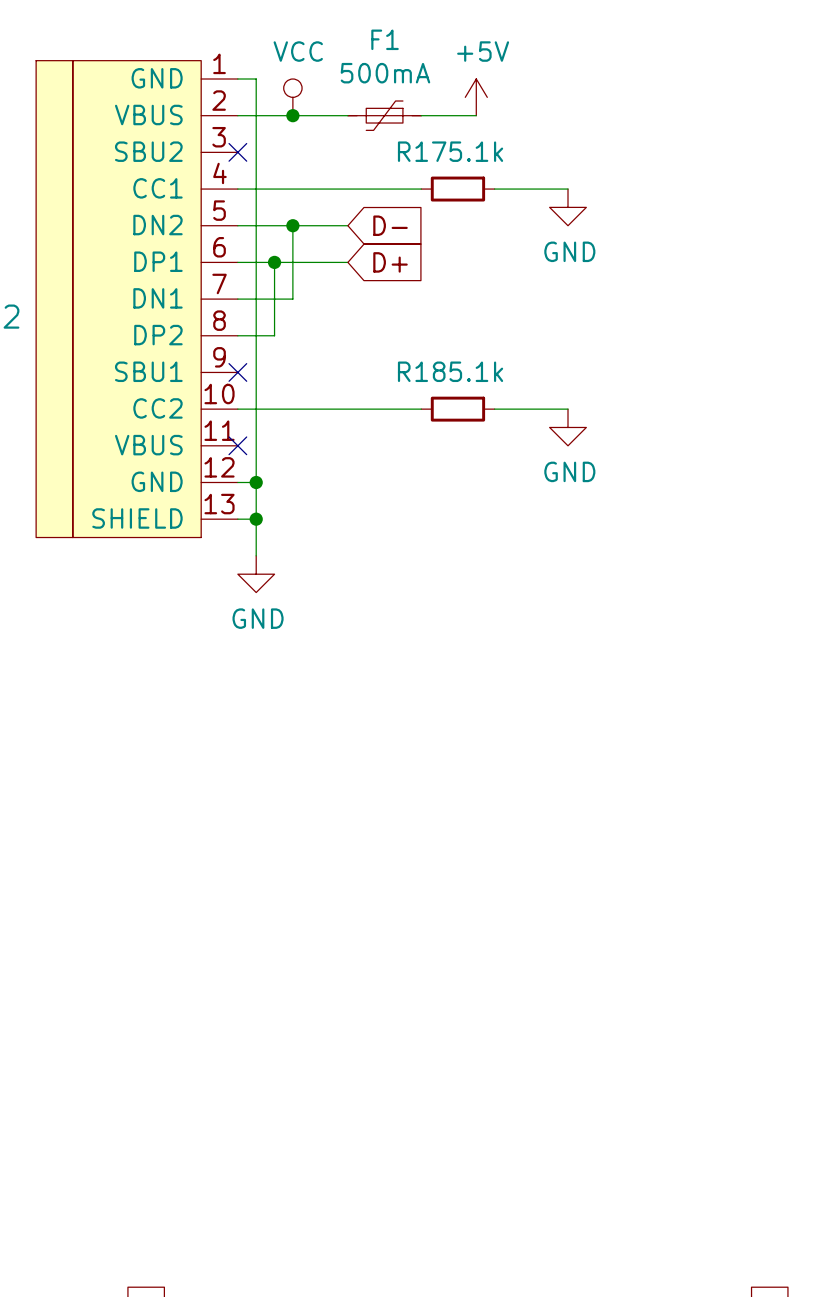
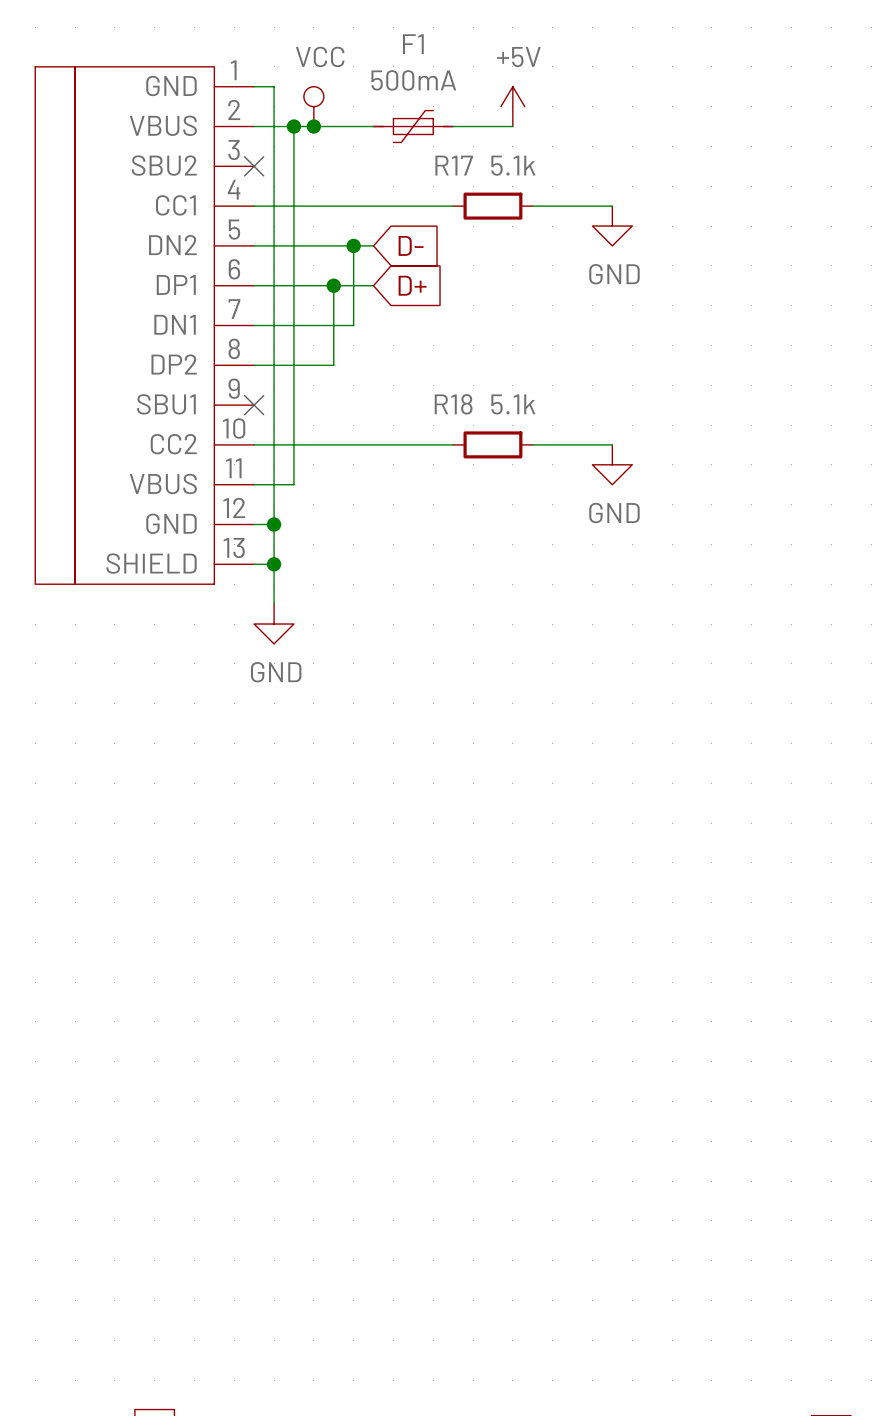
wire: none -> (293, 126) (293, 285)
junction: none -> (293, 126)
wire: (292, 225) (292, 299) -> (353, 245) (353, 325) (313, 325)
junction: (292, 225) -> none
junction: none -> (353, 245)
junction: (274, 262) -> none
wire: none -> (333, 285) (333, 365) (293, 365) (293, 484) (254, 484)
junction: none -> (333, 285)
no-connect mark: (237, 445) -> none

